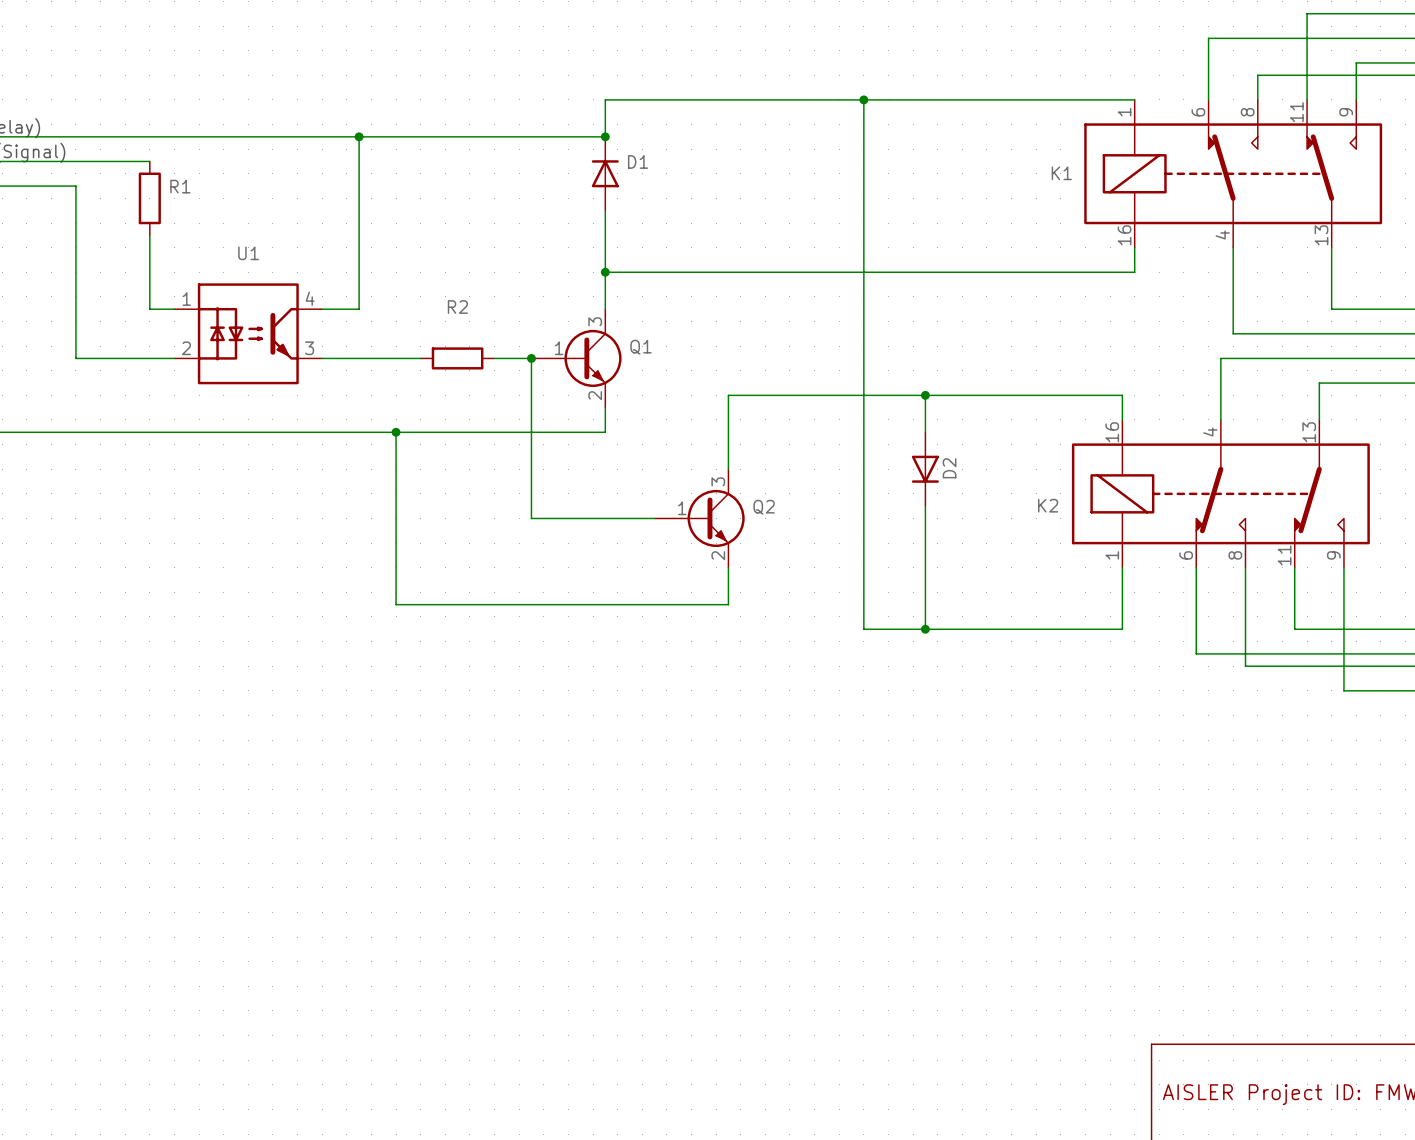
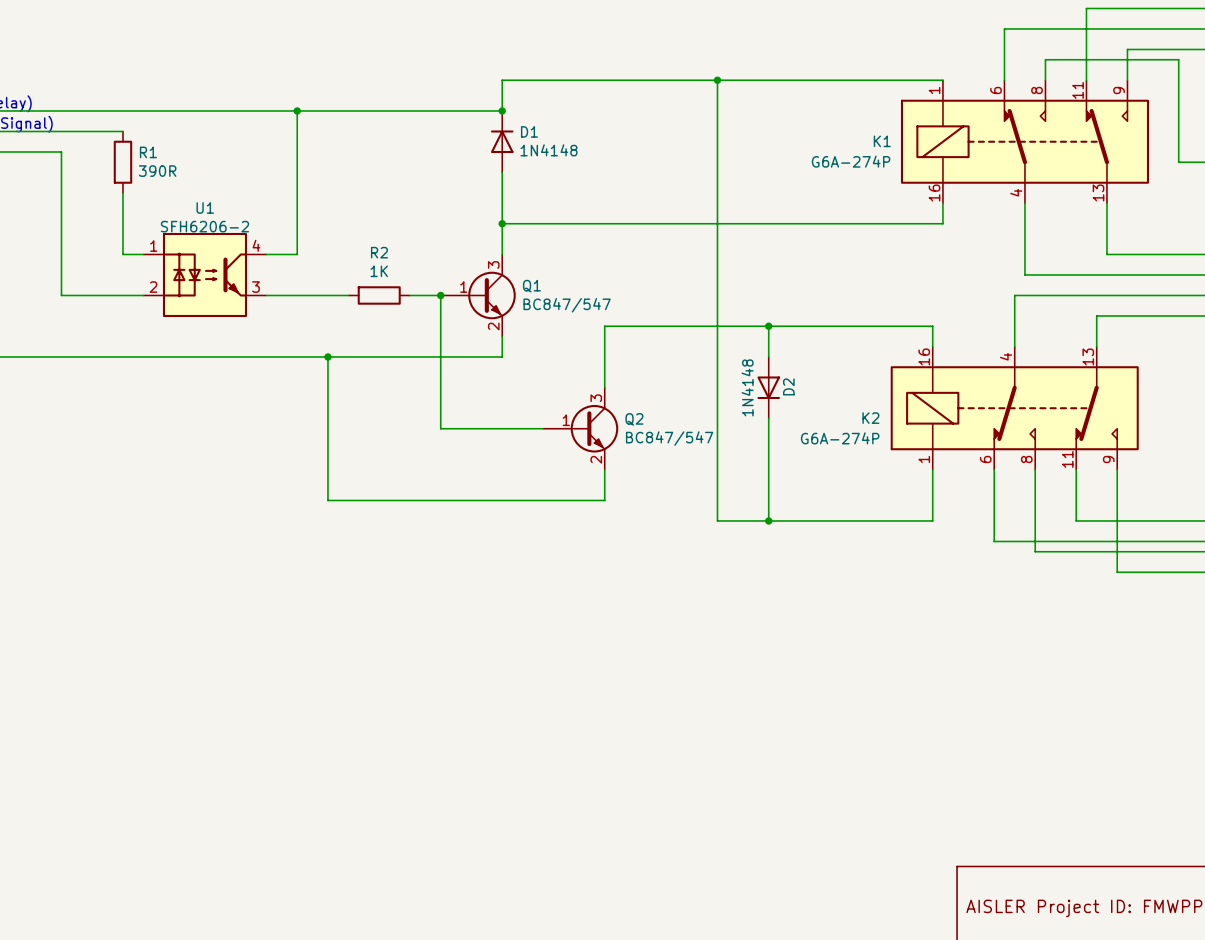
D1 value: none -> 1N4148 (549, 150)
K1 value: none -> G6A-274P (851, 161)
R1 value: none -> 390R (157, 171)
U1 value: none -> SFH6206-2 (204, 226)
R2 value: none -> 1K (379, 271)
Q1 value: none -> BC847/547 (567, 305)
D2 value: none -> 1N4148 (747, 387)
Q2 value: none -> BC847/547 (669, 438)
K2 value: none -> G6A-274P (840, 438)

